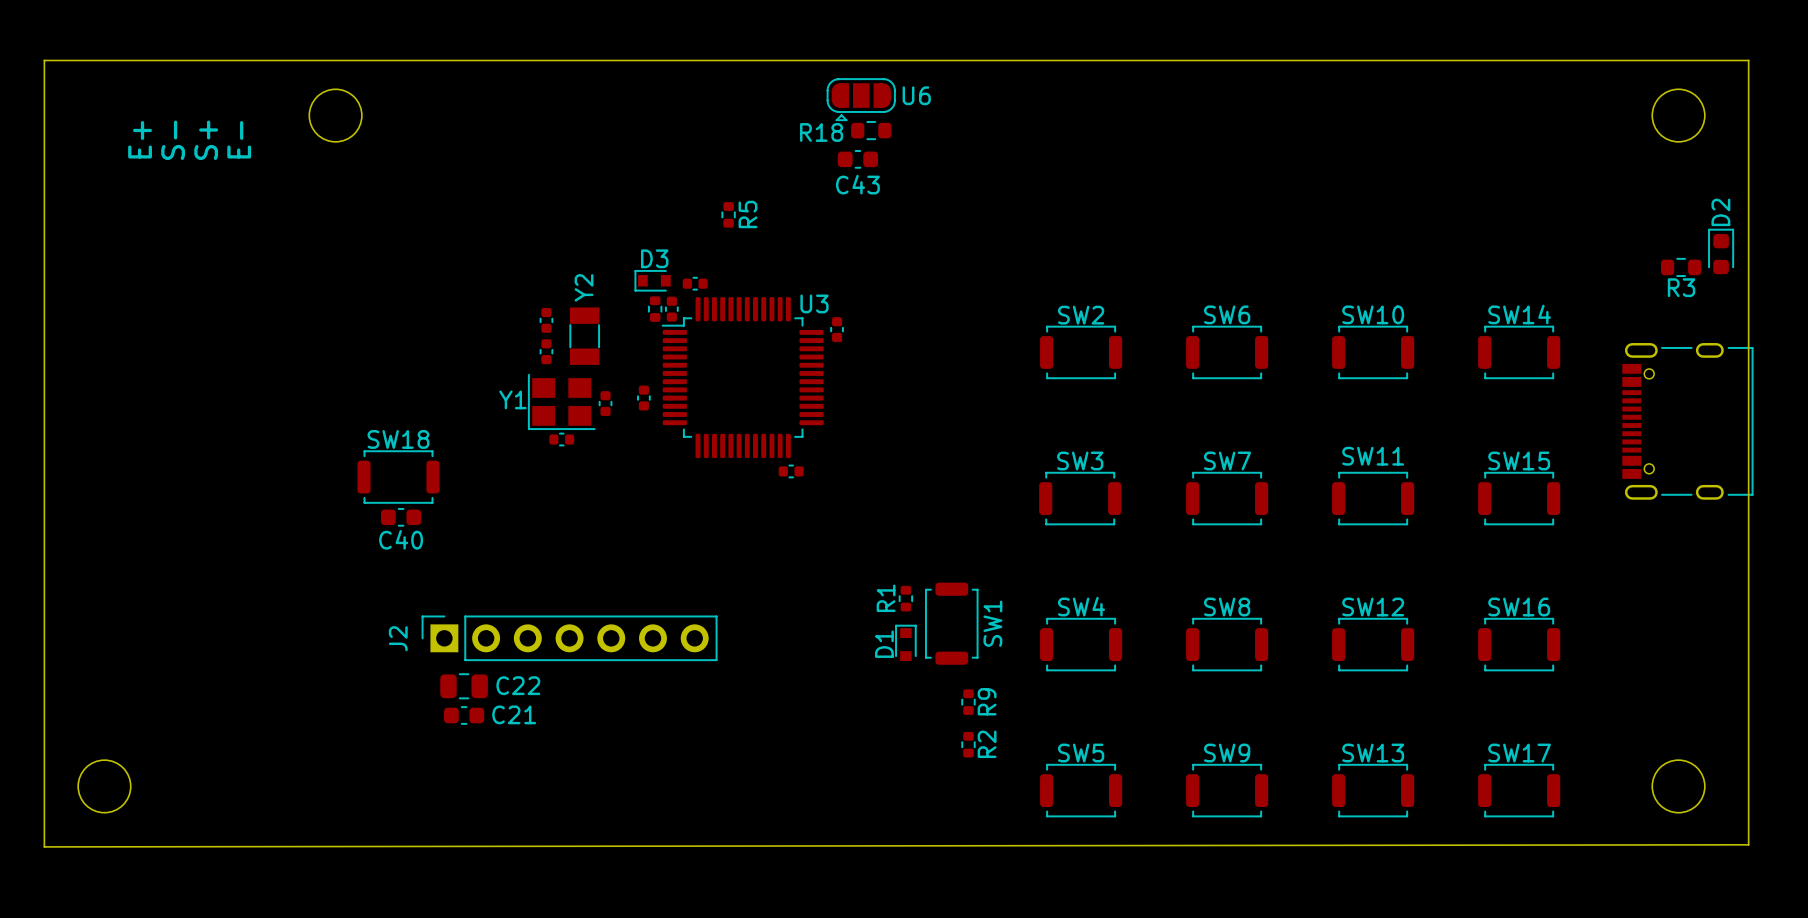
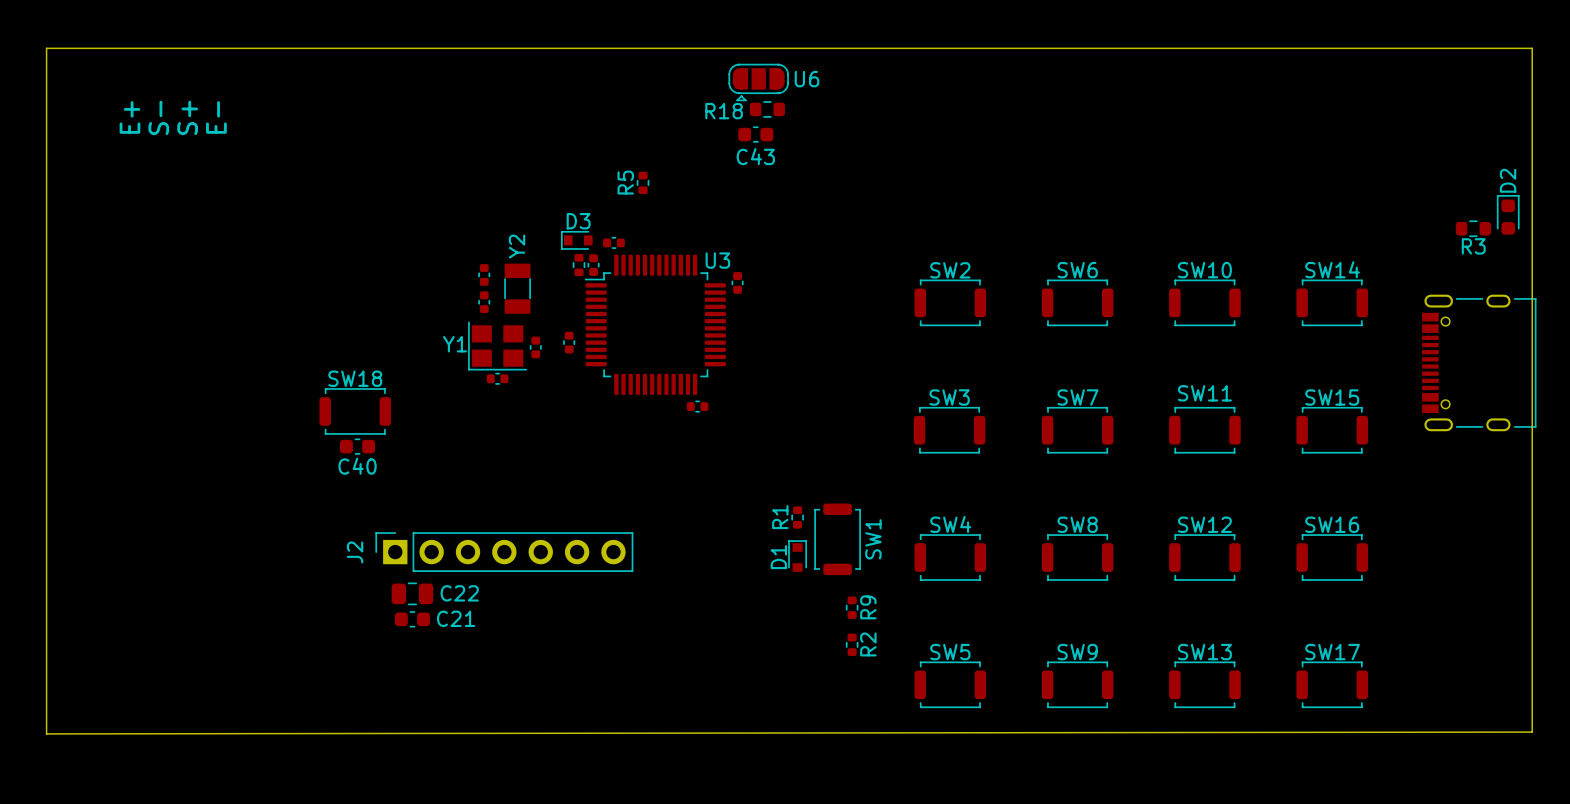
round board edge: [308, 88, 363, 143] -> none
round board edge: [1651, 88, 1706, 143] -> none
R5 name position: R5 (748, 214) -> R5 (625, 182)
round board edge: [77, 759, 132, 814] -> none
round board edge: [1651, 759, 1706, 814] -> none

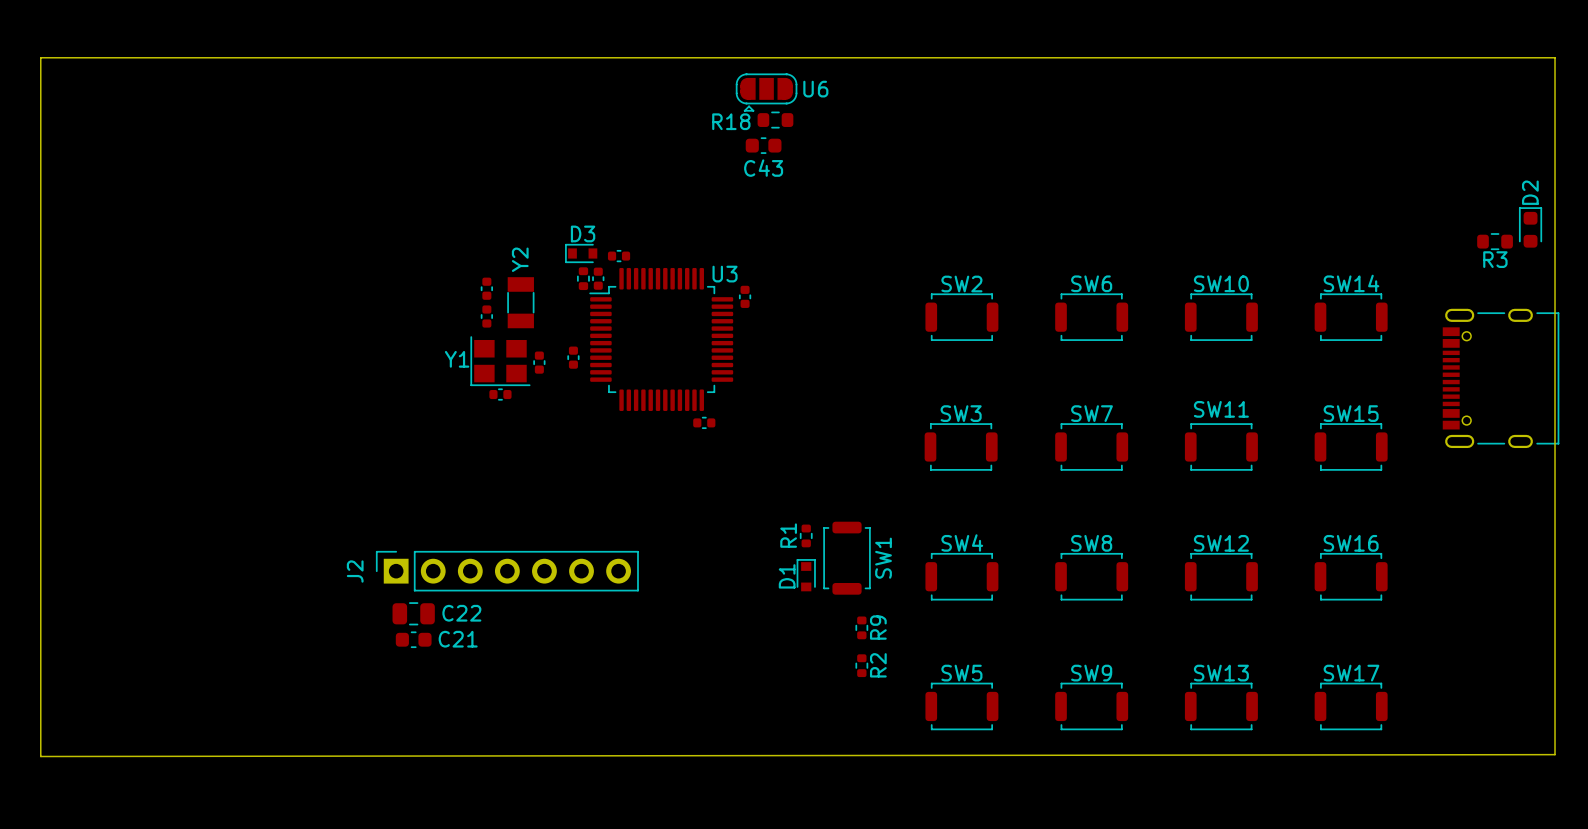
text: E+ (129, 117) -> none
text: S- (158, 117) -> none
text: S+ (187, 117) -> none
text: E- (216, 117) -> none
R5: (643, 182) -> none
SW18: (355, 411) -> none
C40: (357, 446) -> none

